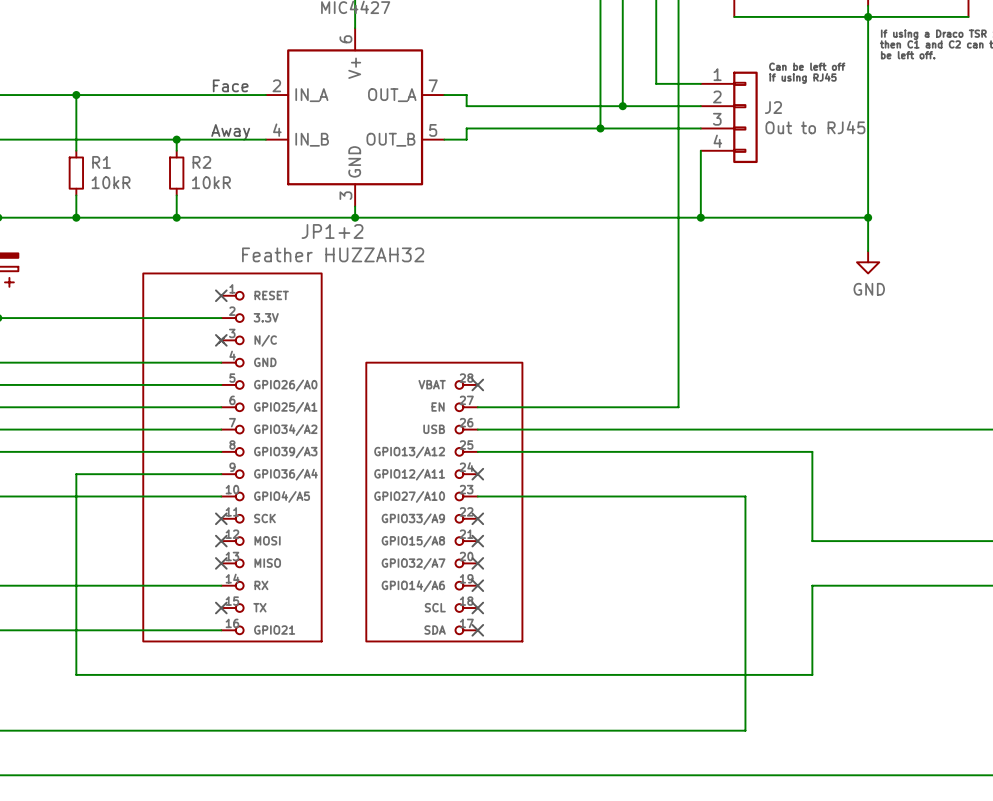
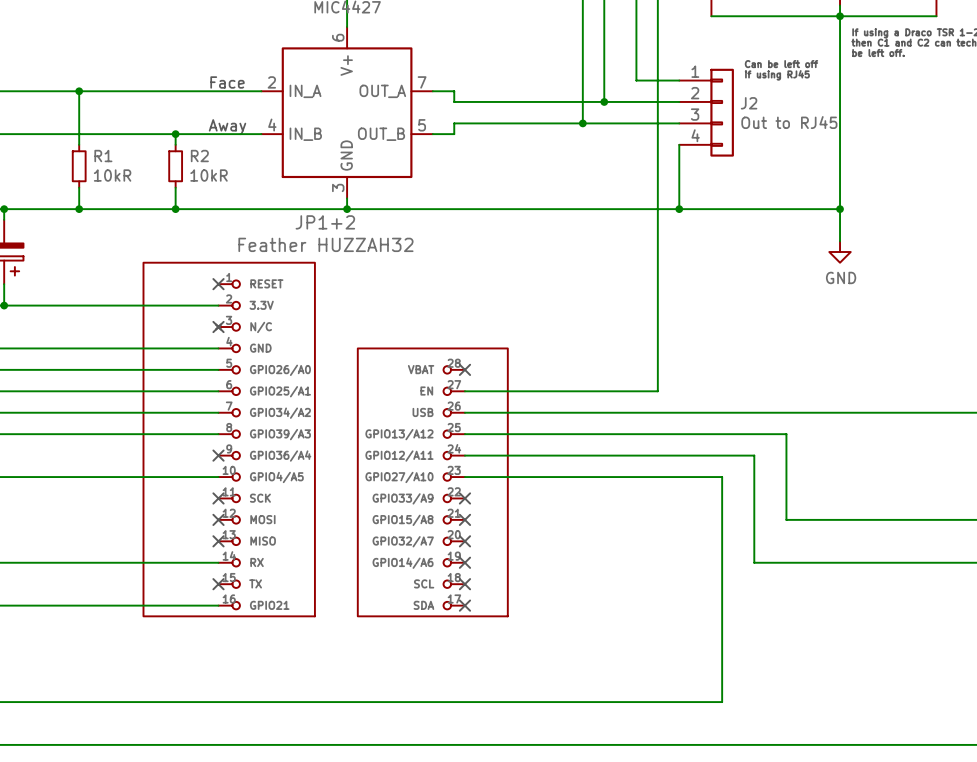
wire: (221, 474) (76, 474) (76, 674) (812, 674) (812, 585) -> (464, 455) (754, 455) (754, 562) (786, 562)
no-connect mark: none -> (218, 455)
no-connect mark: (477, 474) -> none

